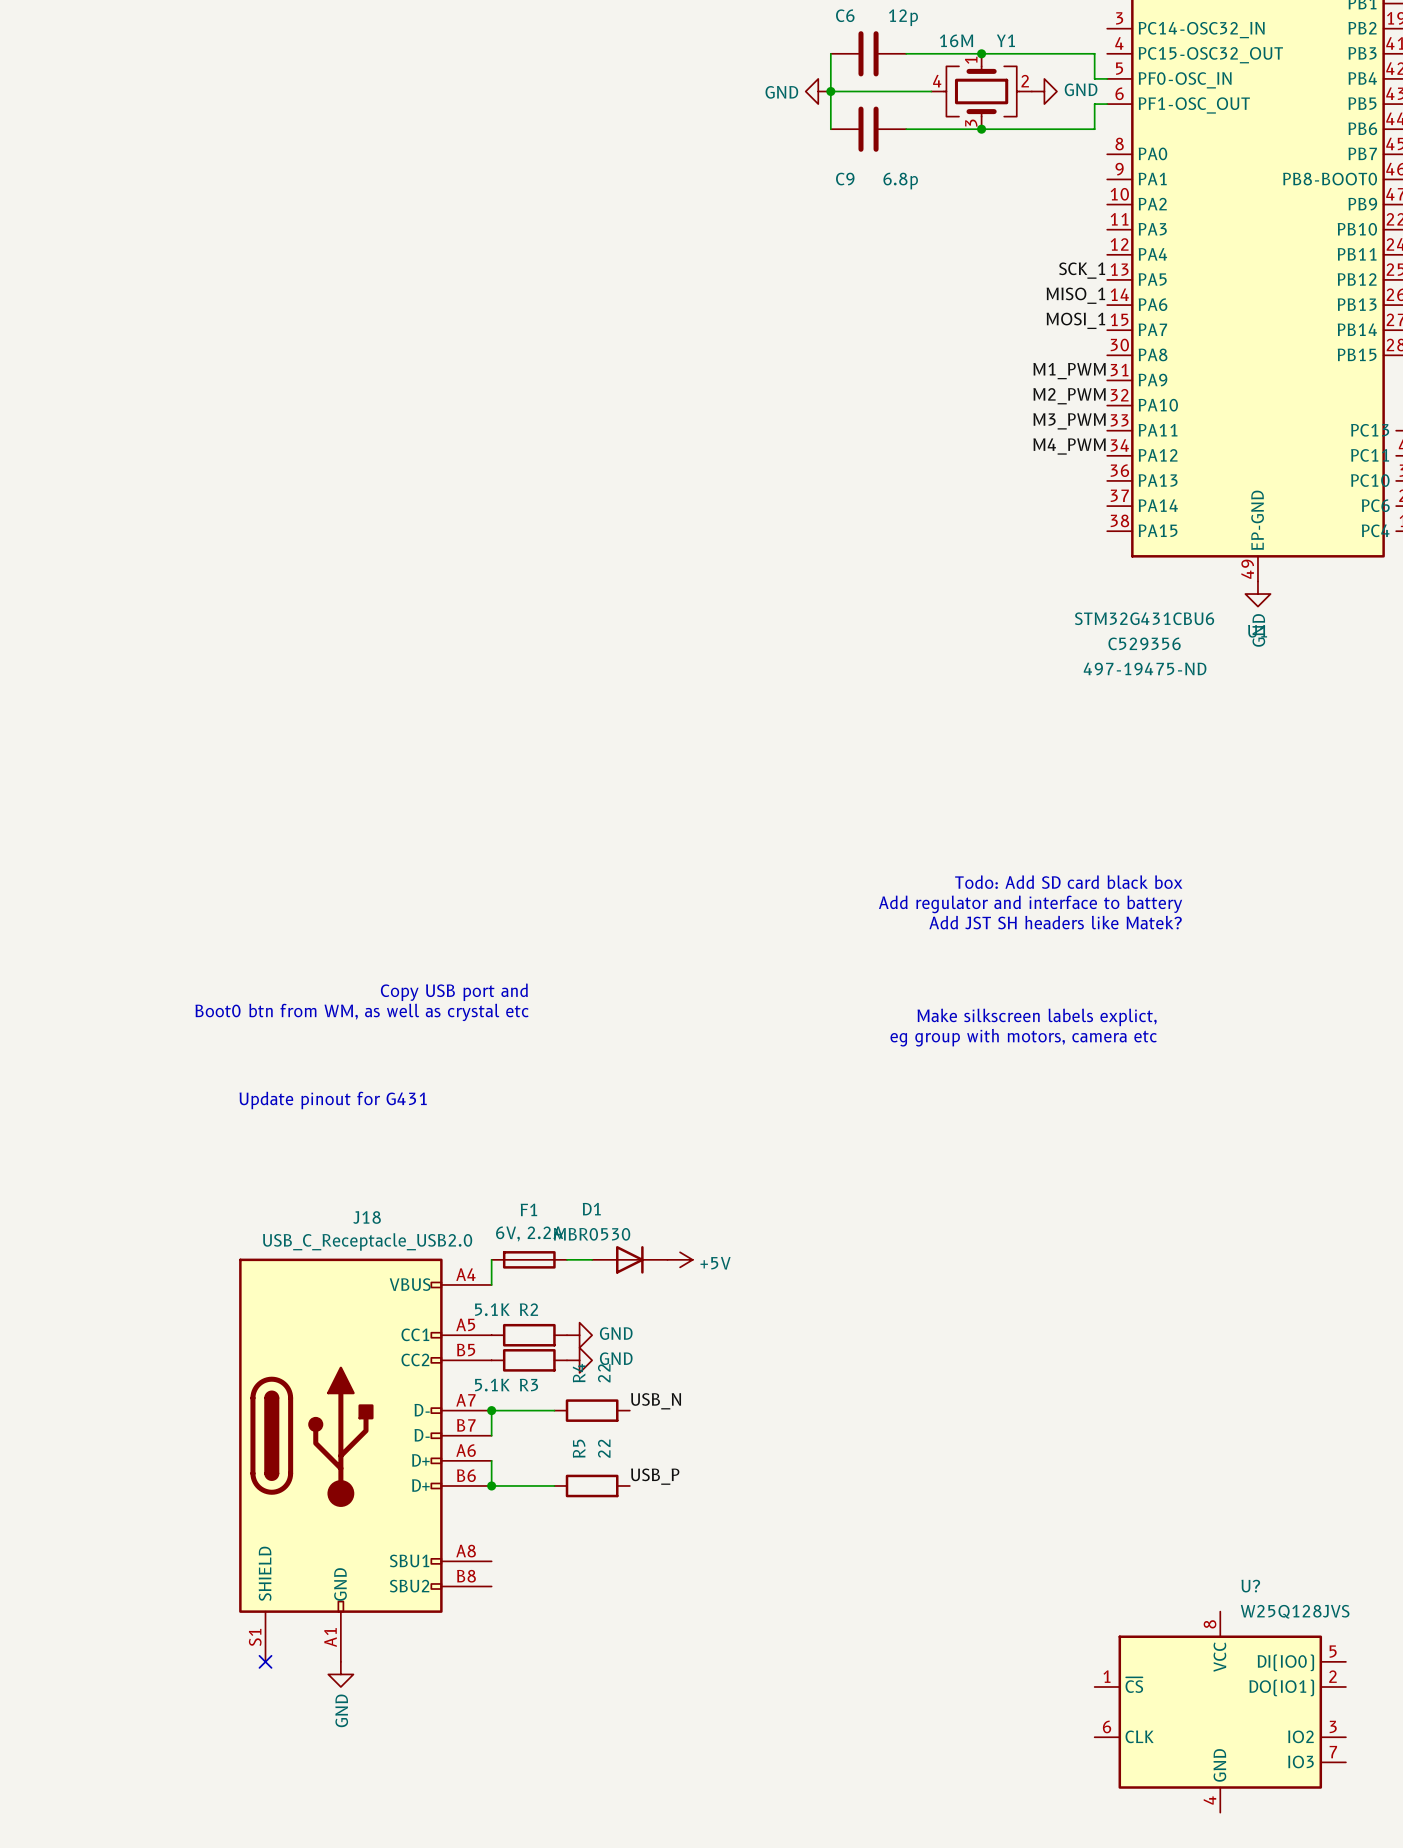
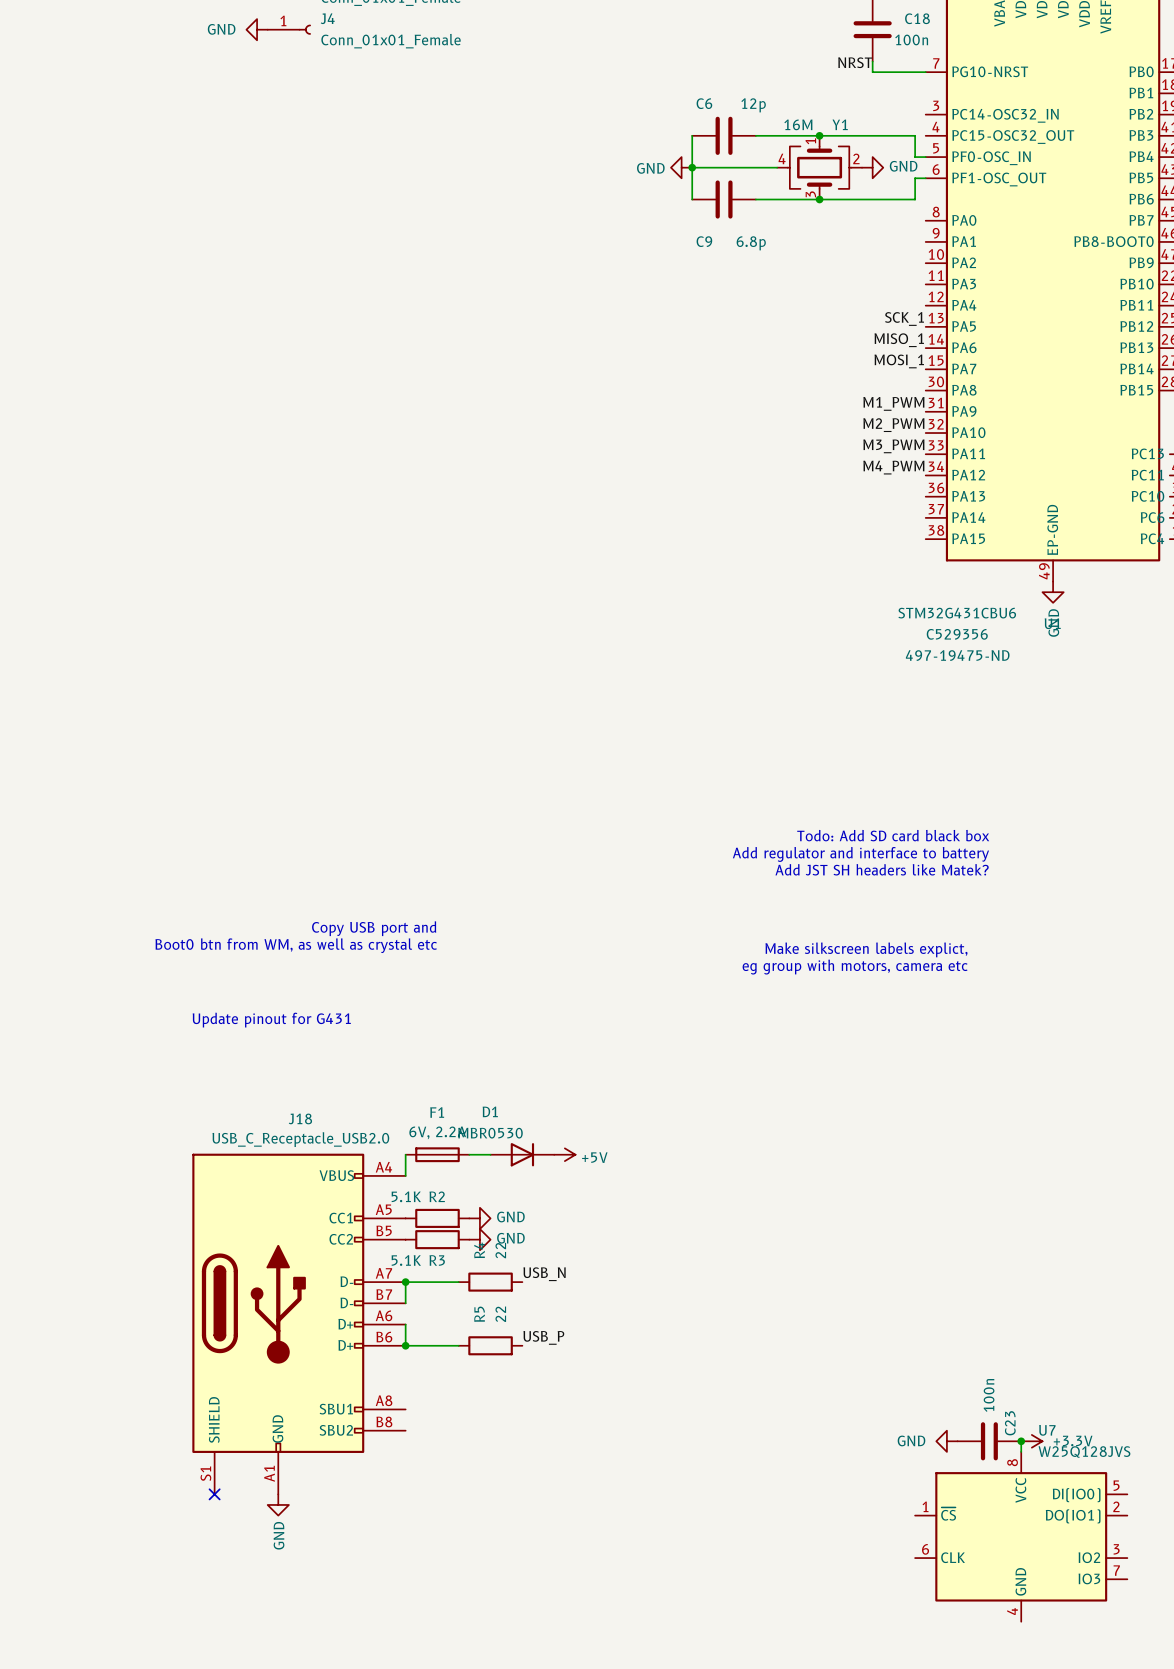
U? name: U? (1250, 1586) -> U7 (1047, 1430)
power symbol: none -> GND (946, 1441)
C23: none -> 100n (989, 1441)
wire: none -> (1021, 1441) (1021, 1451)
junction: none -> (1021, 1441)
power symbol: none -> +3.3V (1031, 1441)

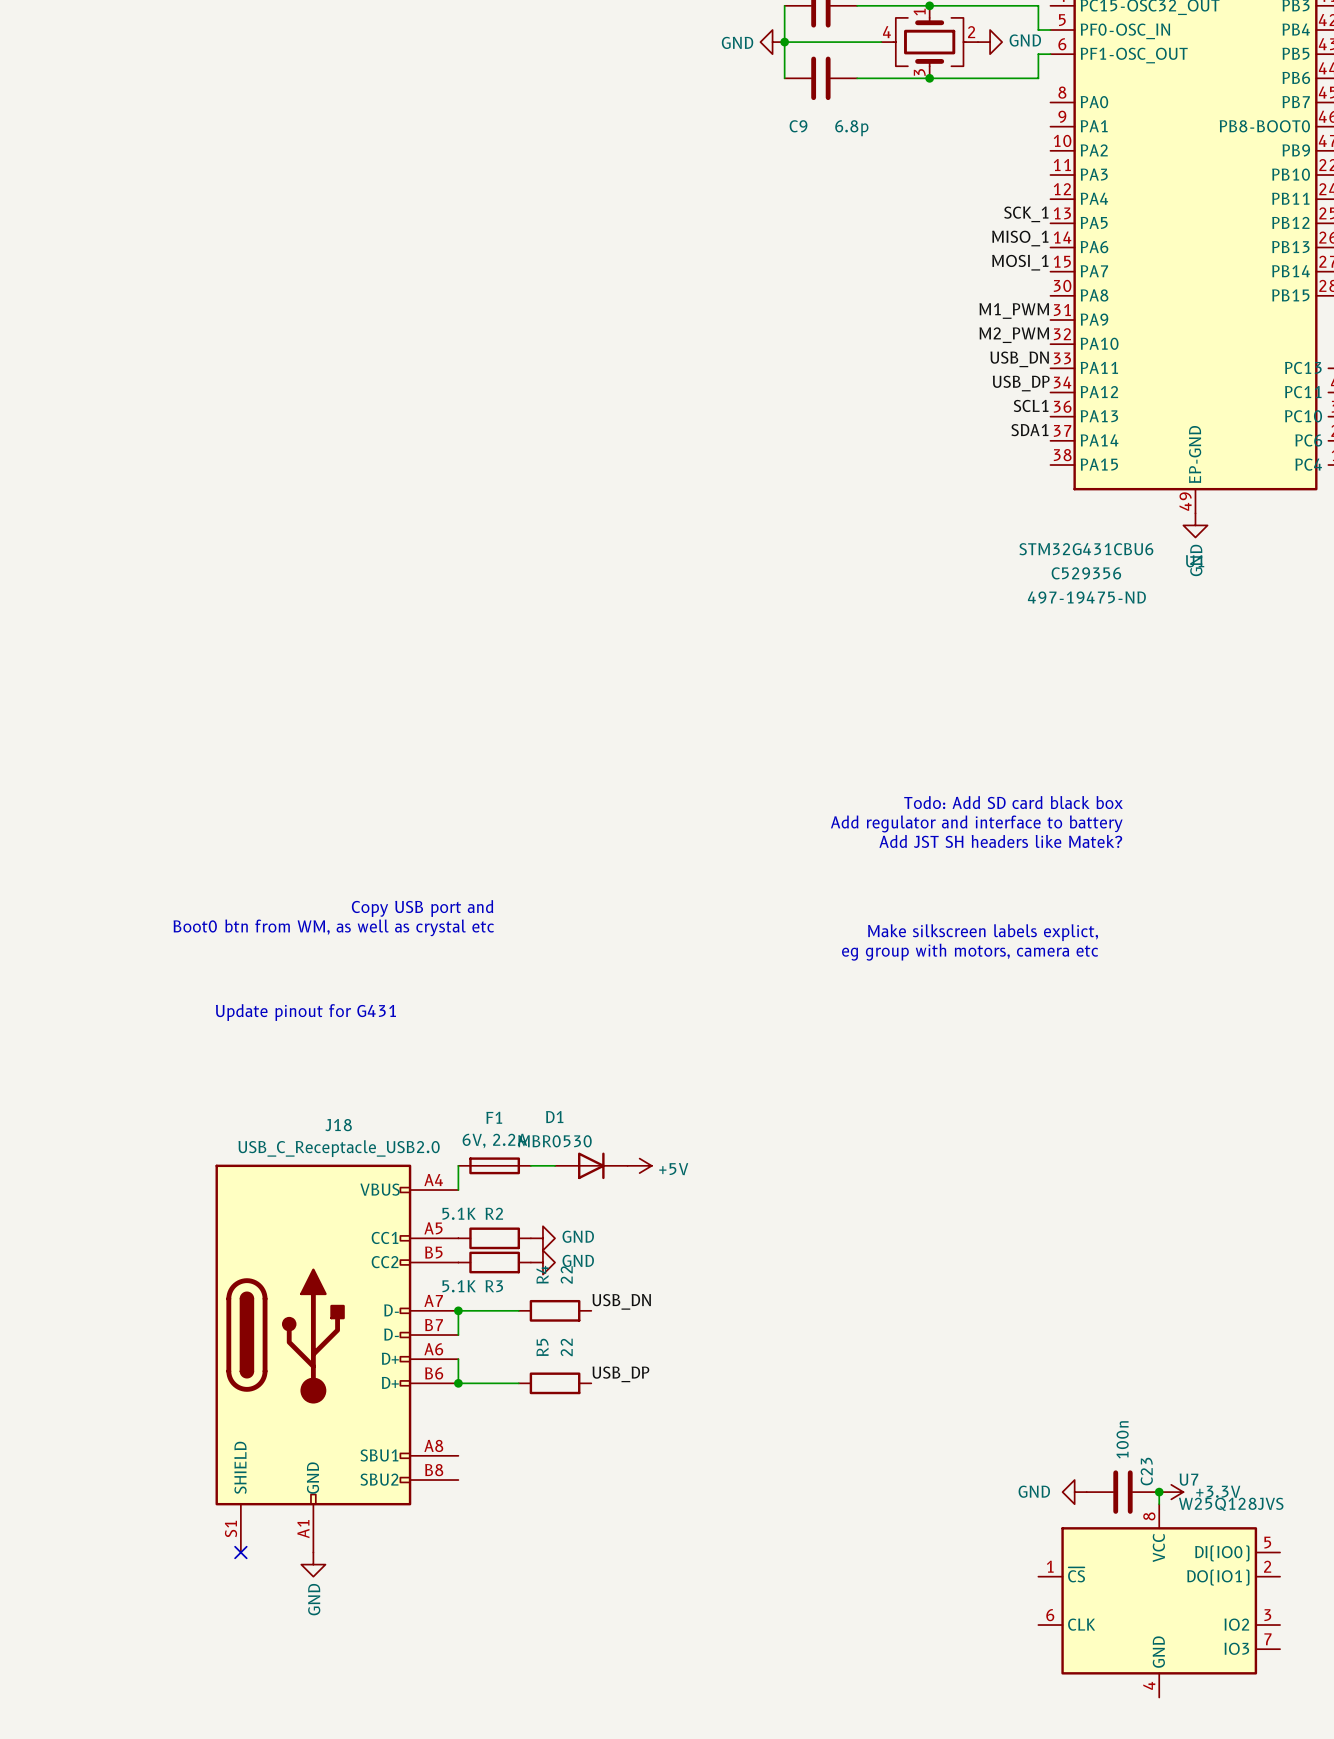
label: M3_PWM (893, 446) -> USB_DN (1019, 359)
label: M4_PWM (893, 467) -> USB_DP (1021, 383)
label: none -> SCL1 (1031, 405)
label: none -> SDA1 (1029, 430)
label: USB_N (544, 1274) -> USB_DN (621, 1301)
label: USB_P (543, 1337) -> USB_DP (620, 1374)

